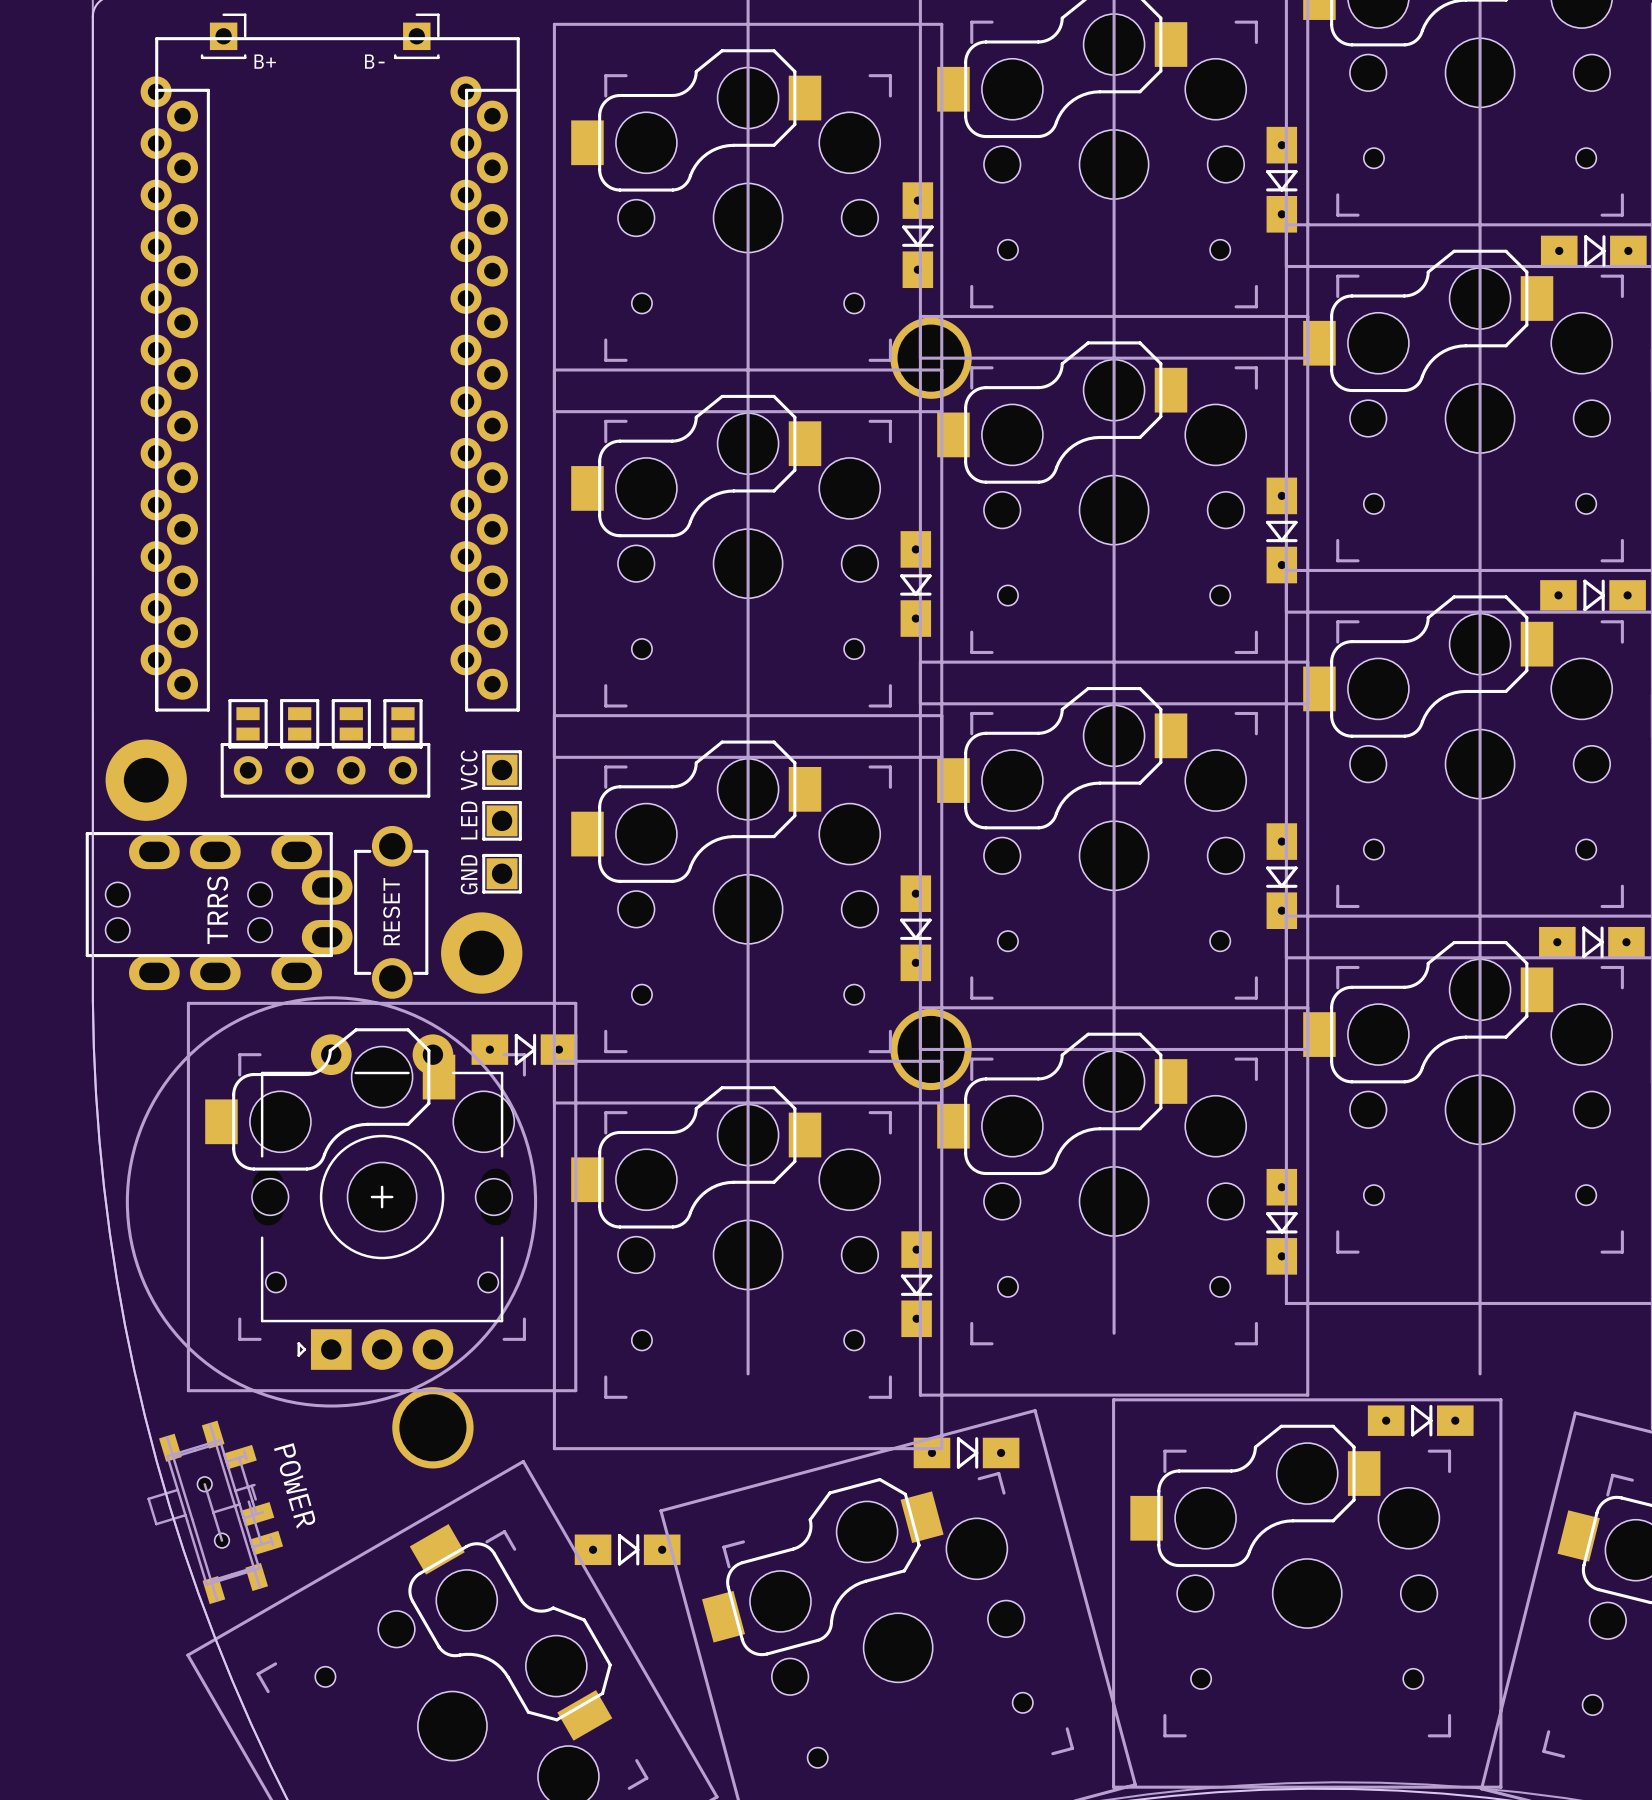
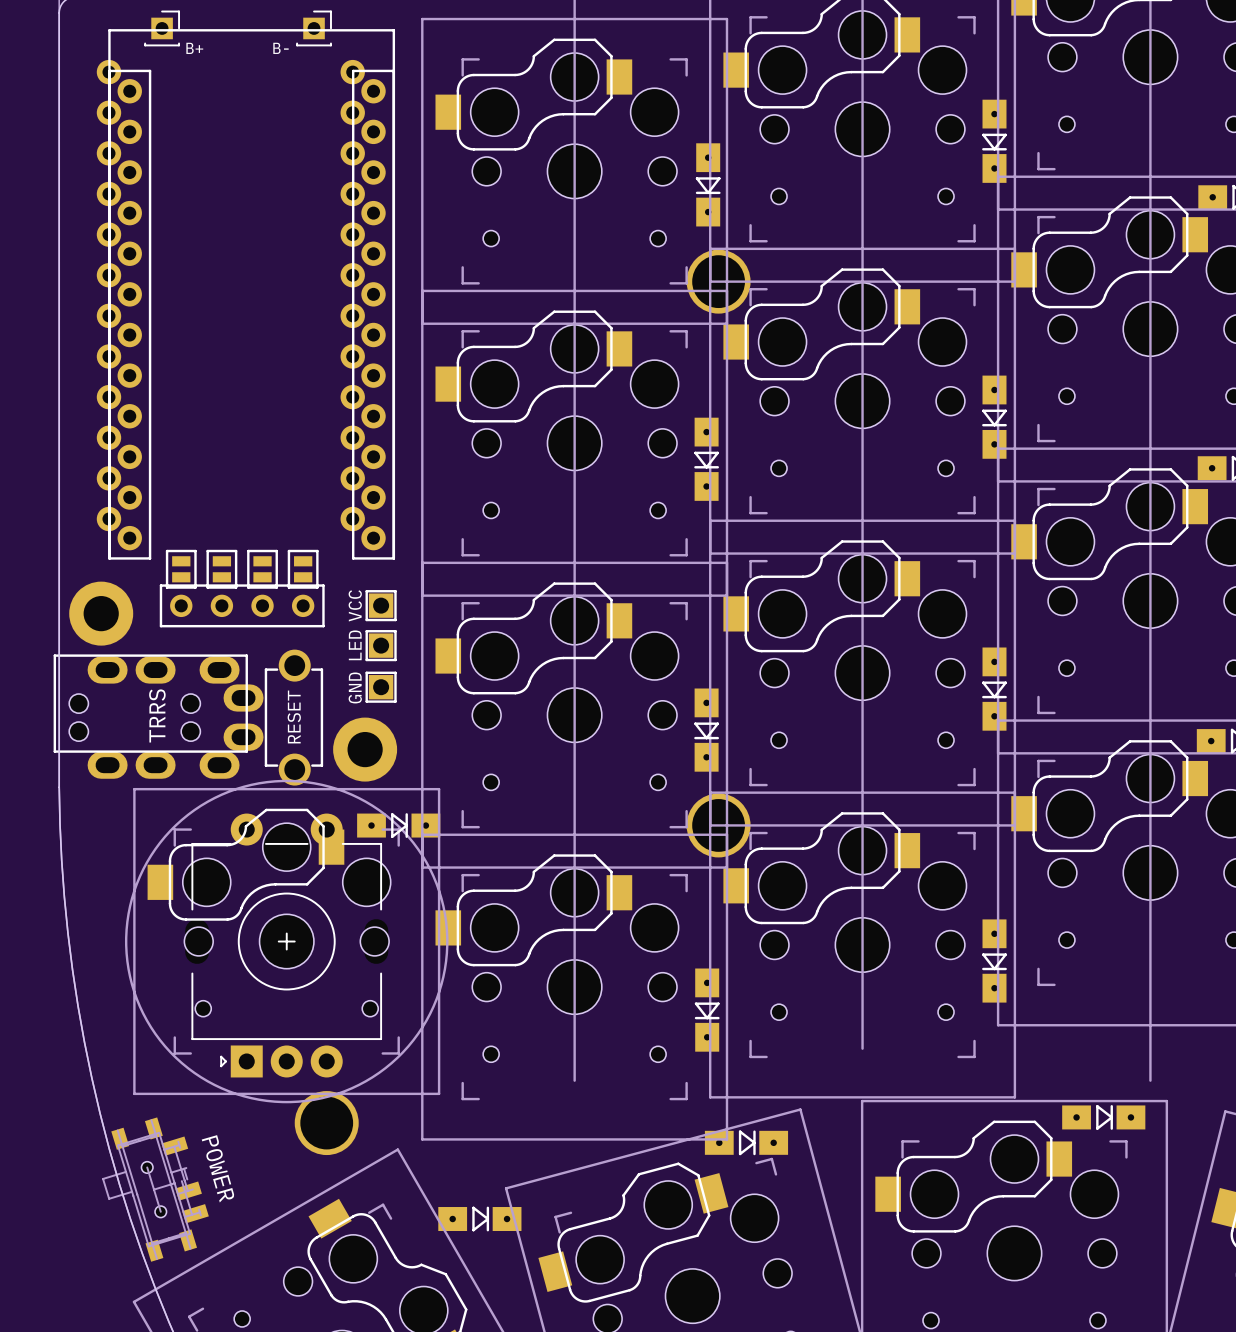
drawing position: (331, 1201) -> (286, 941)

